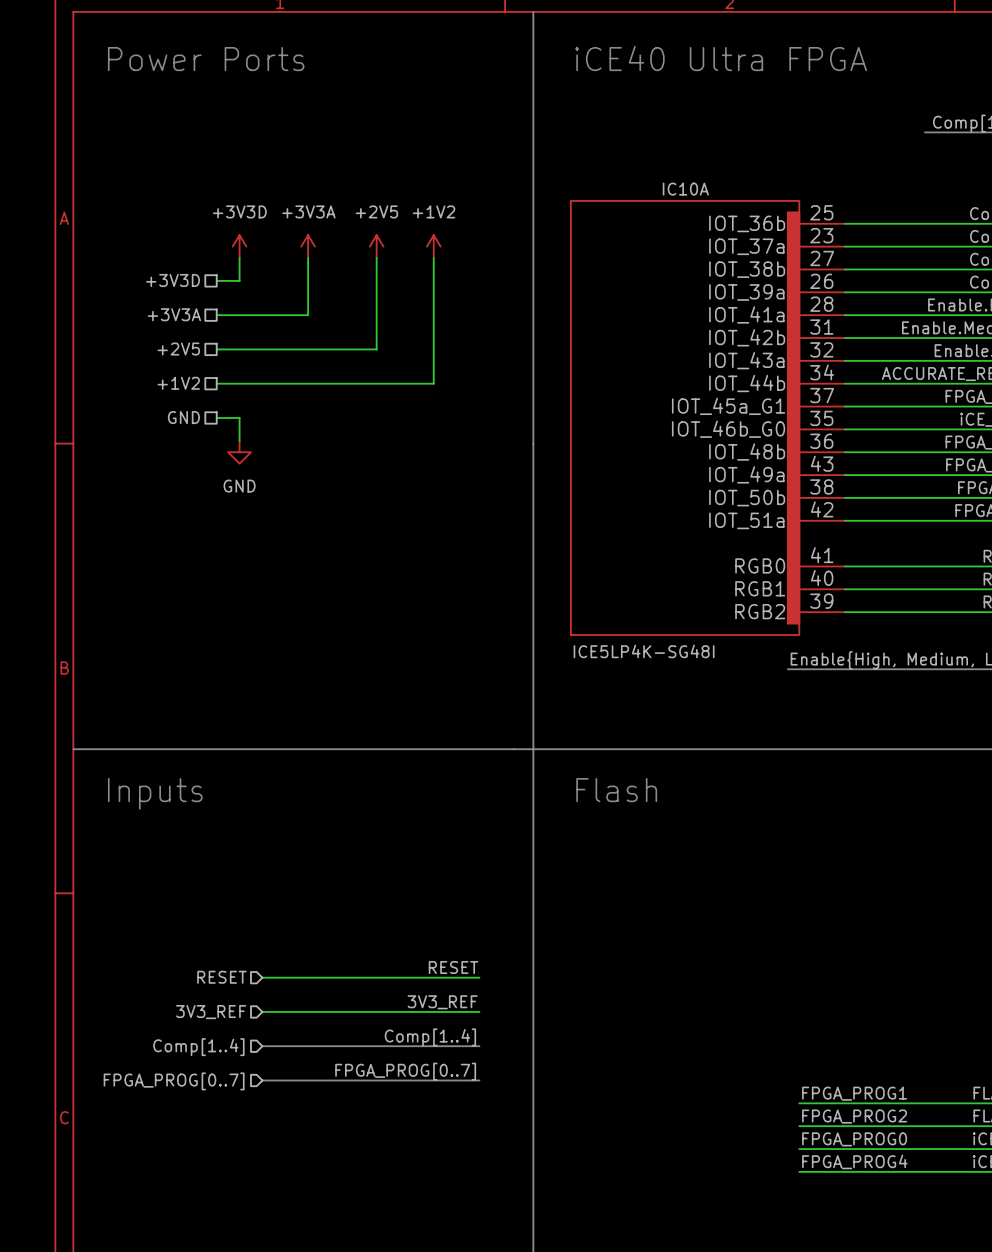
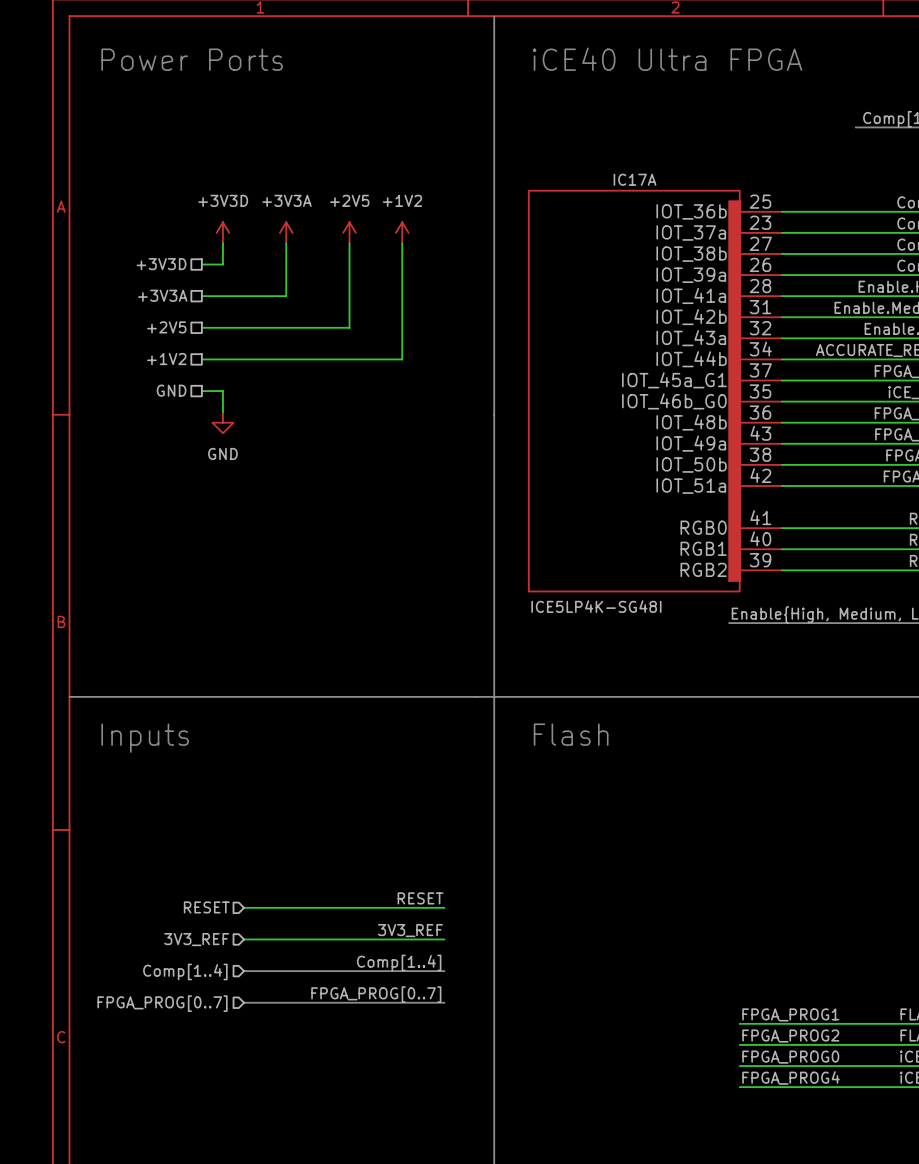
IC10A name: IC10A (685, 189) -> IC17A (635, 179)

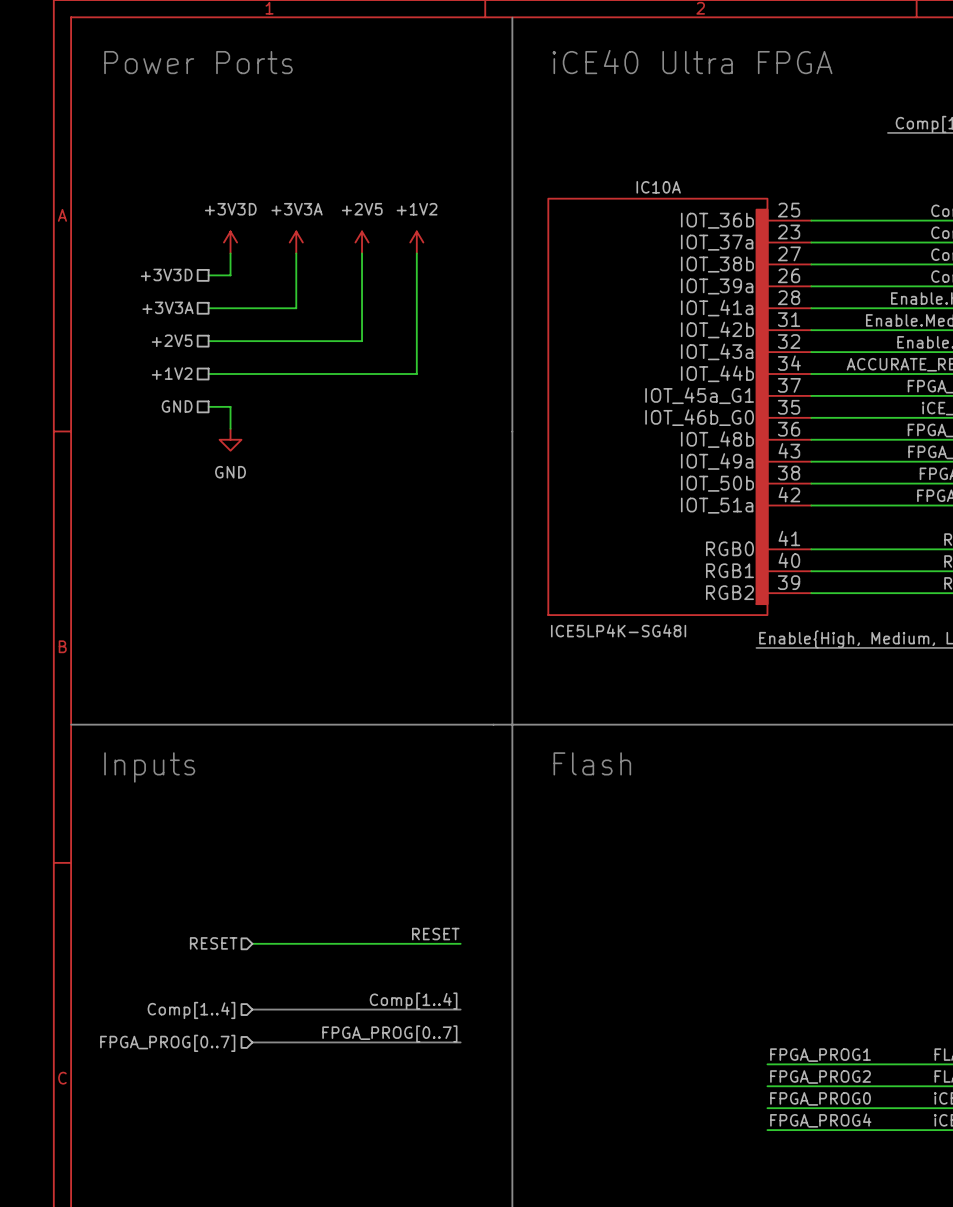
IC17A name: IC17A (635, 179) -> IC10A (658, 187)
label: 3V3_REF (410, 930) -> none
hierarchical label: 3V3_REF (196, 939) -> none
wire: (244, 939) (444, 939) -> none

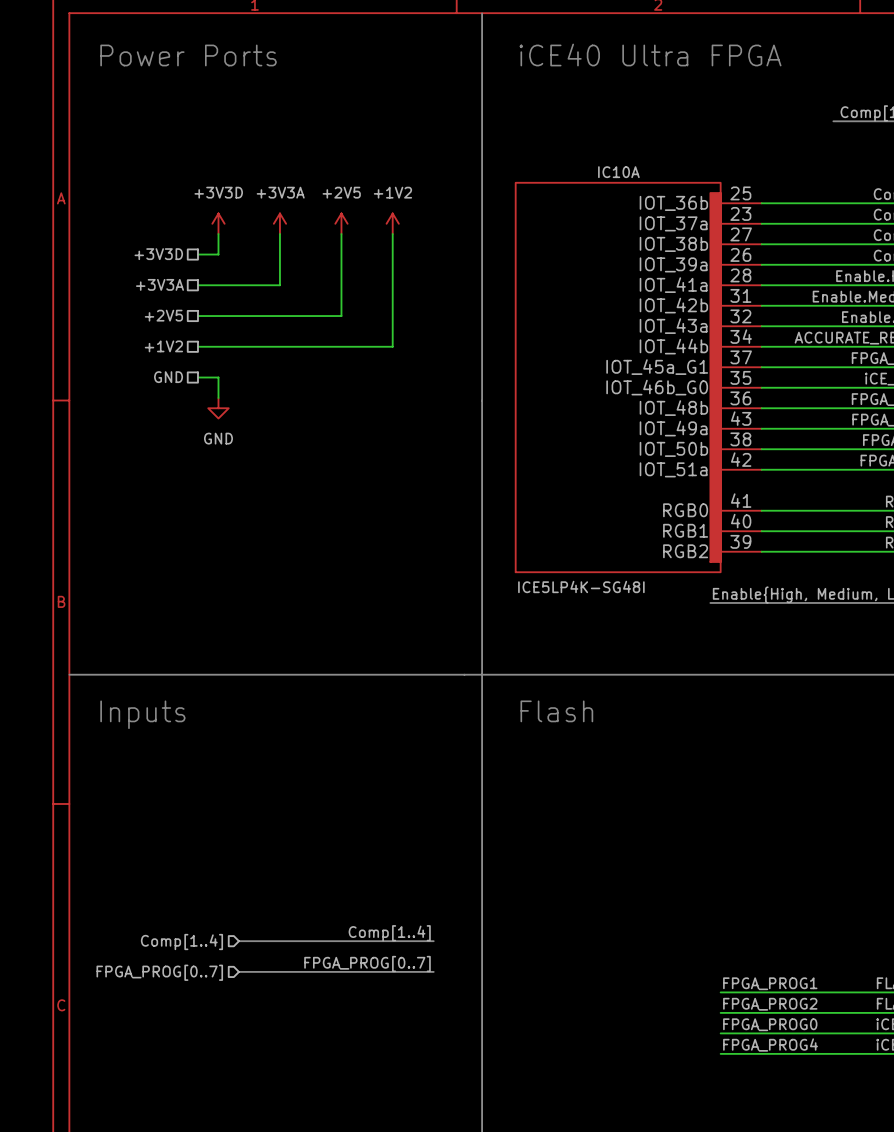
label: RESET (435, 934) -> none
hierarchical label: RESET (213, 943) -> none
wire: (252, 943) (460, 943) -> none

